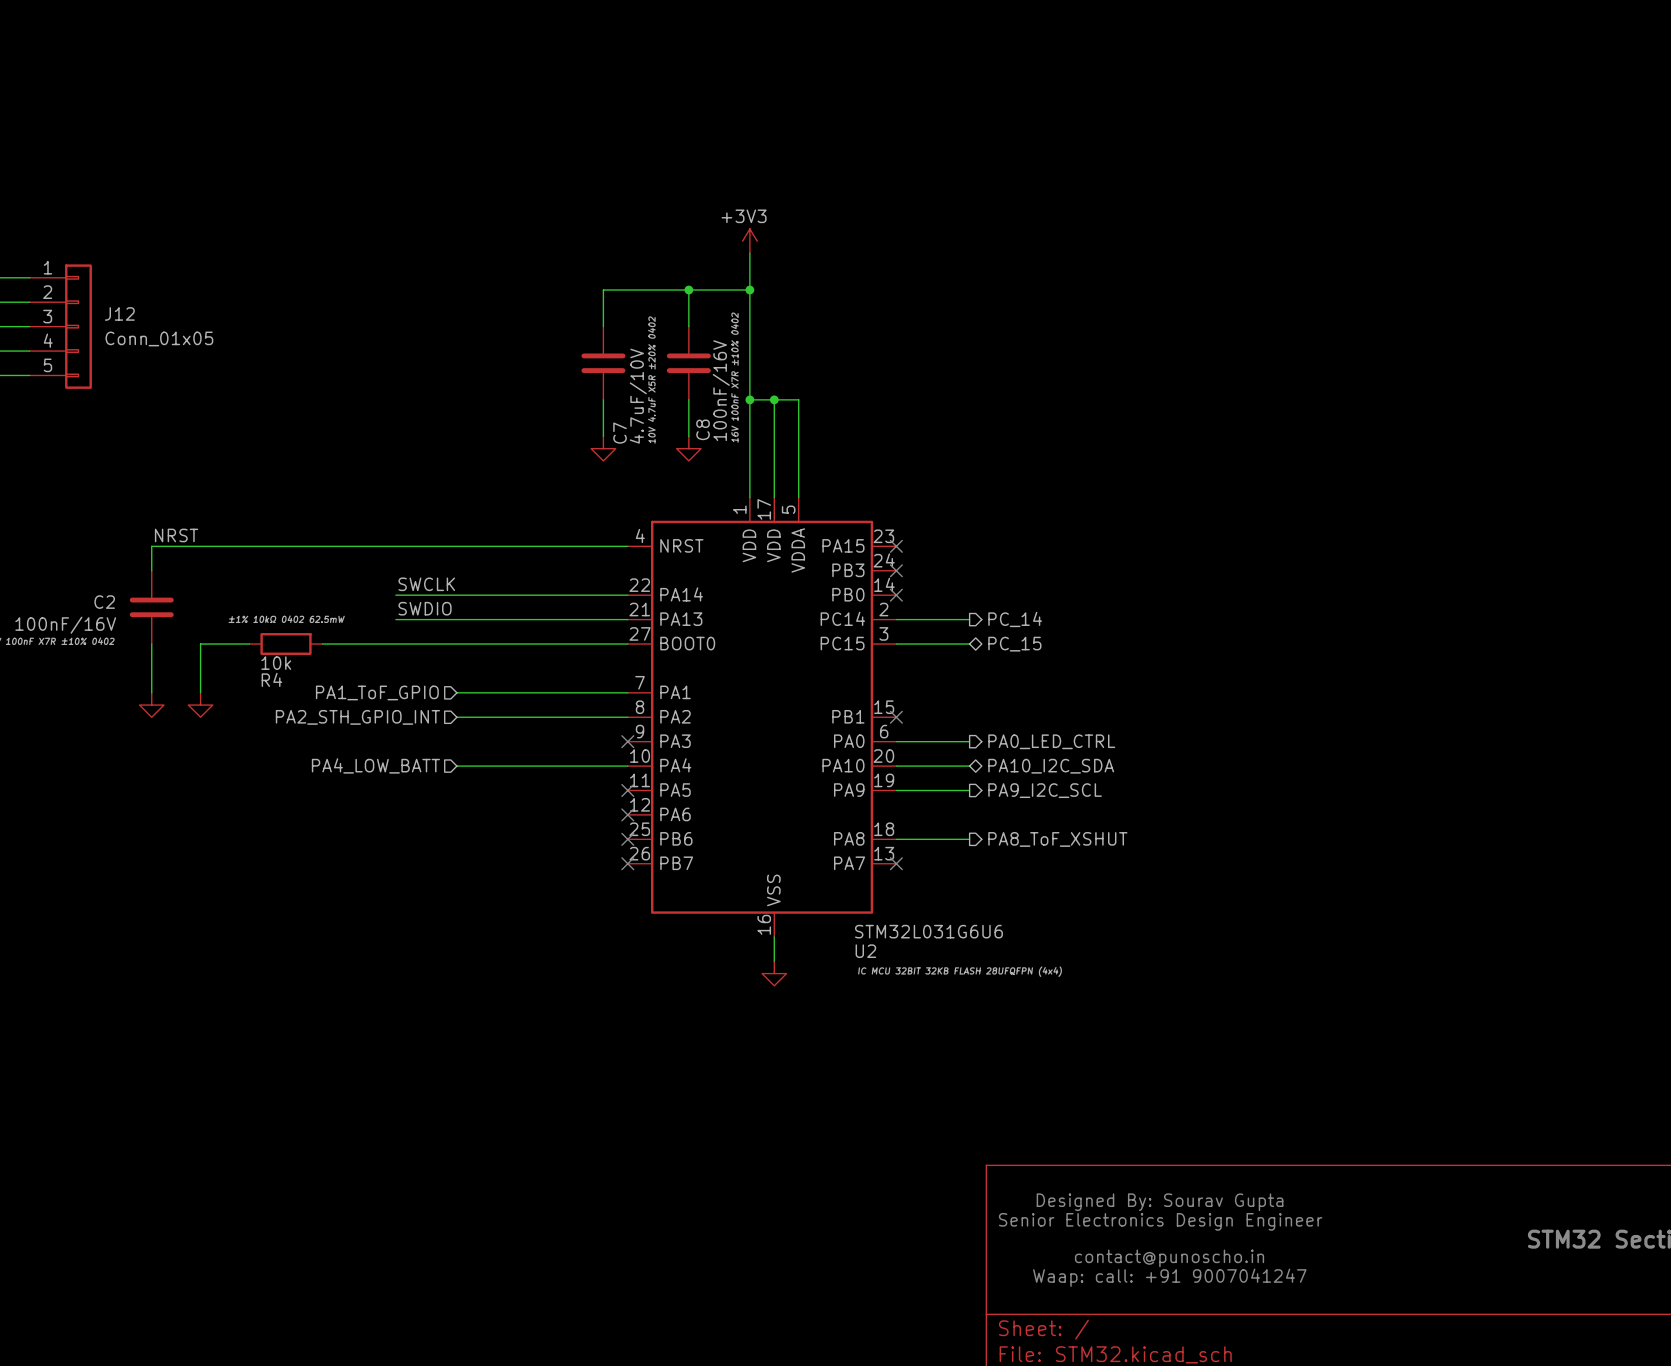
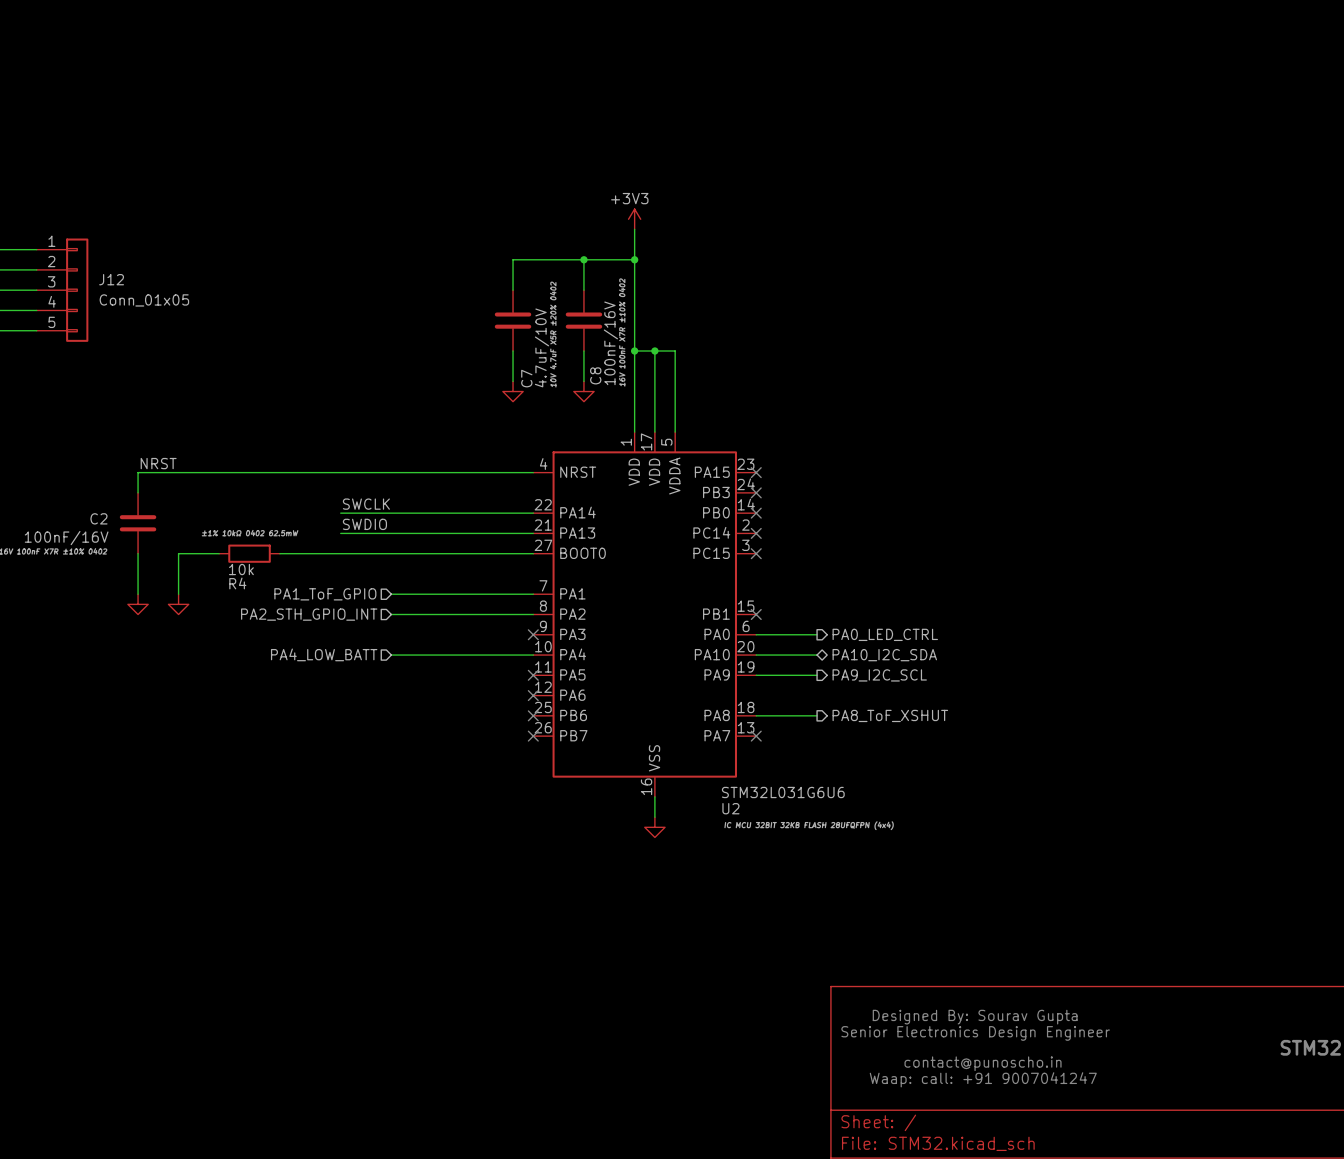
wire: (896, 619) (969, 619) -> none
no-connect mark: none -> (756, 533)
hierarchical label: PC_14 (1015, 619) -> none
wire: (896, 644) (969, 644) -> none
no-connect mark: none -> (756, 553)
hierarchical label: PC_15 (1014, 644) -> none

